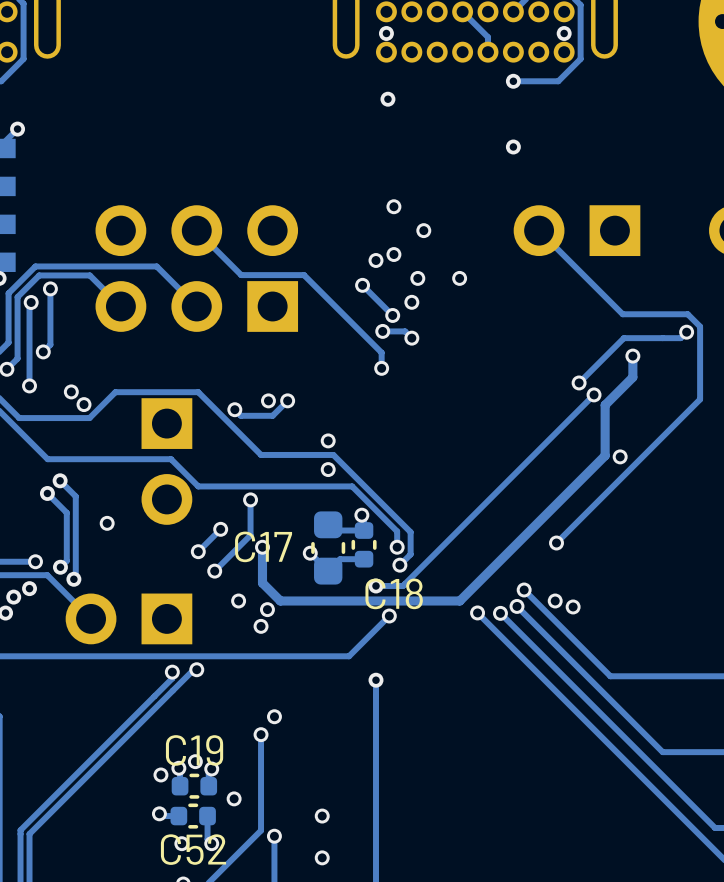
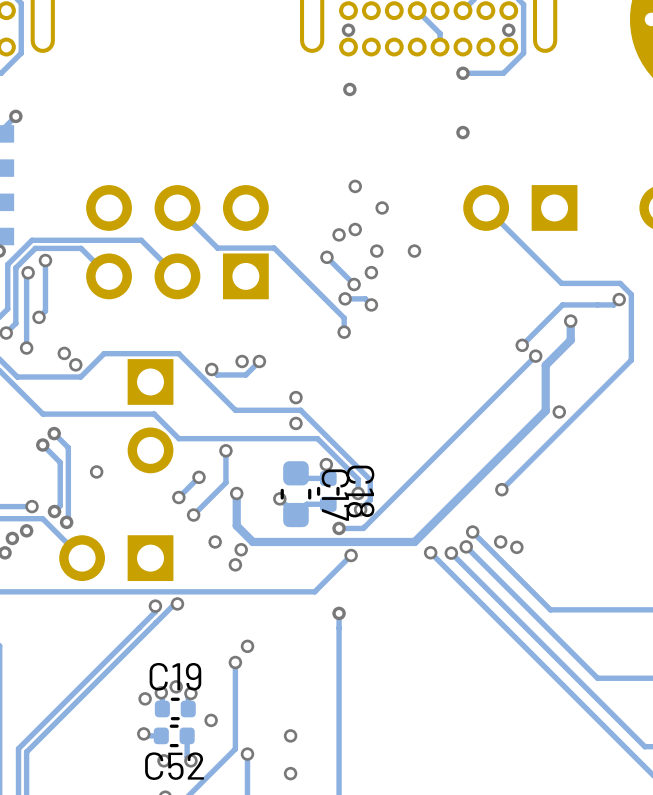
C17 name rotation: 0° (263, 546) -> 90° clockwise (335, 495)
C17 name position: C17 (263, 546) -> C17 (335, 495)
C18 name rotation: 0° (394, 593) -> 90° clockwise (360, 491)

